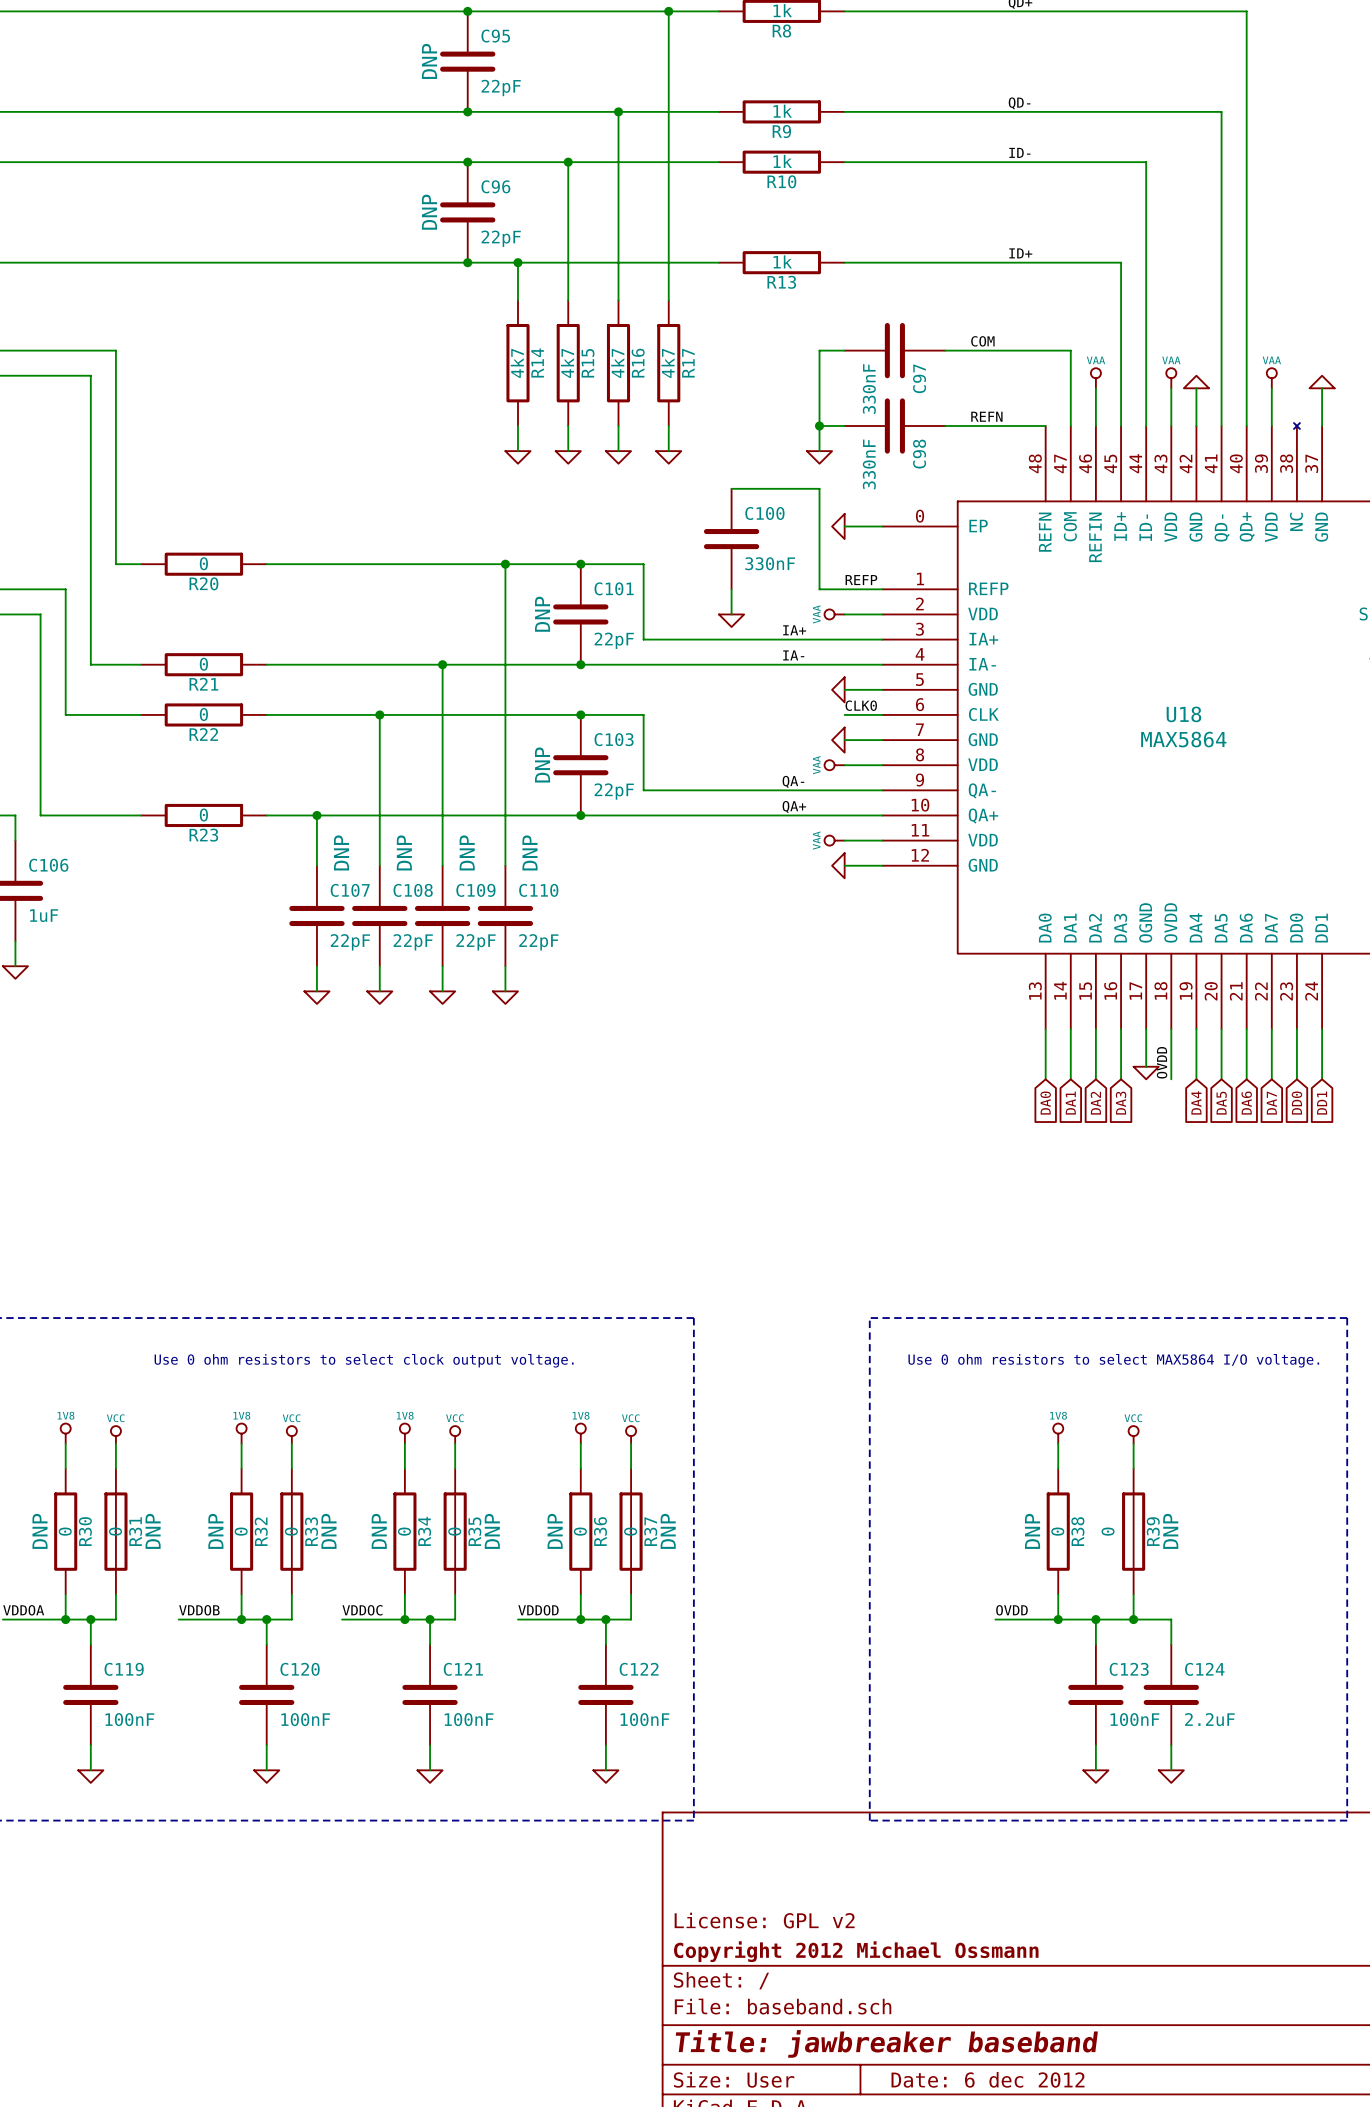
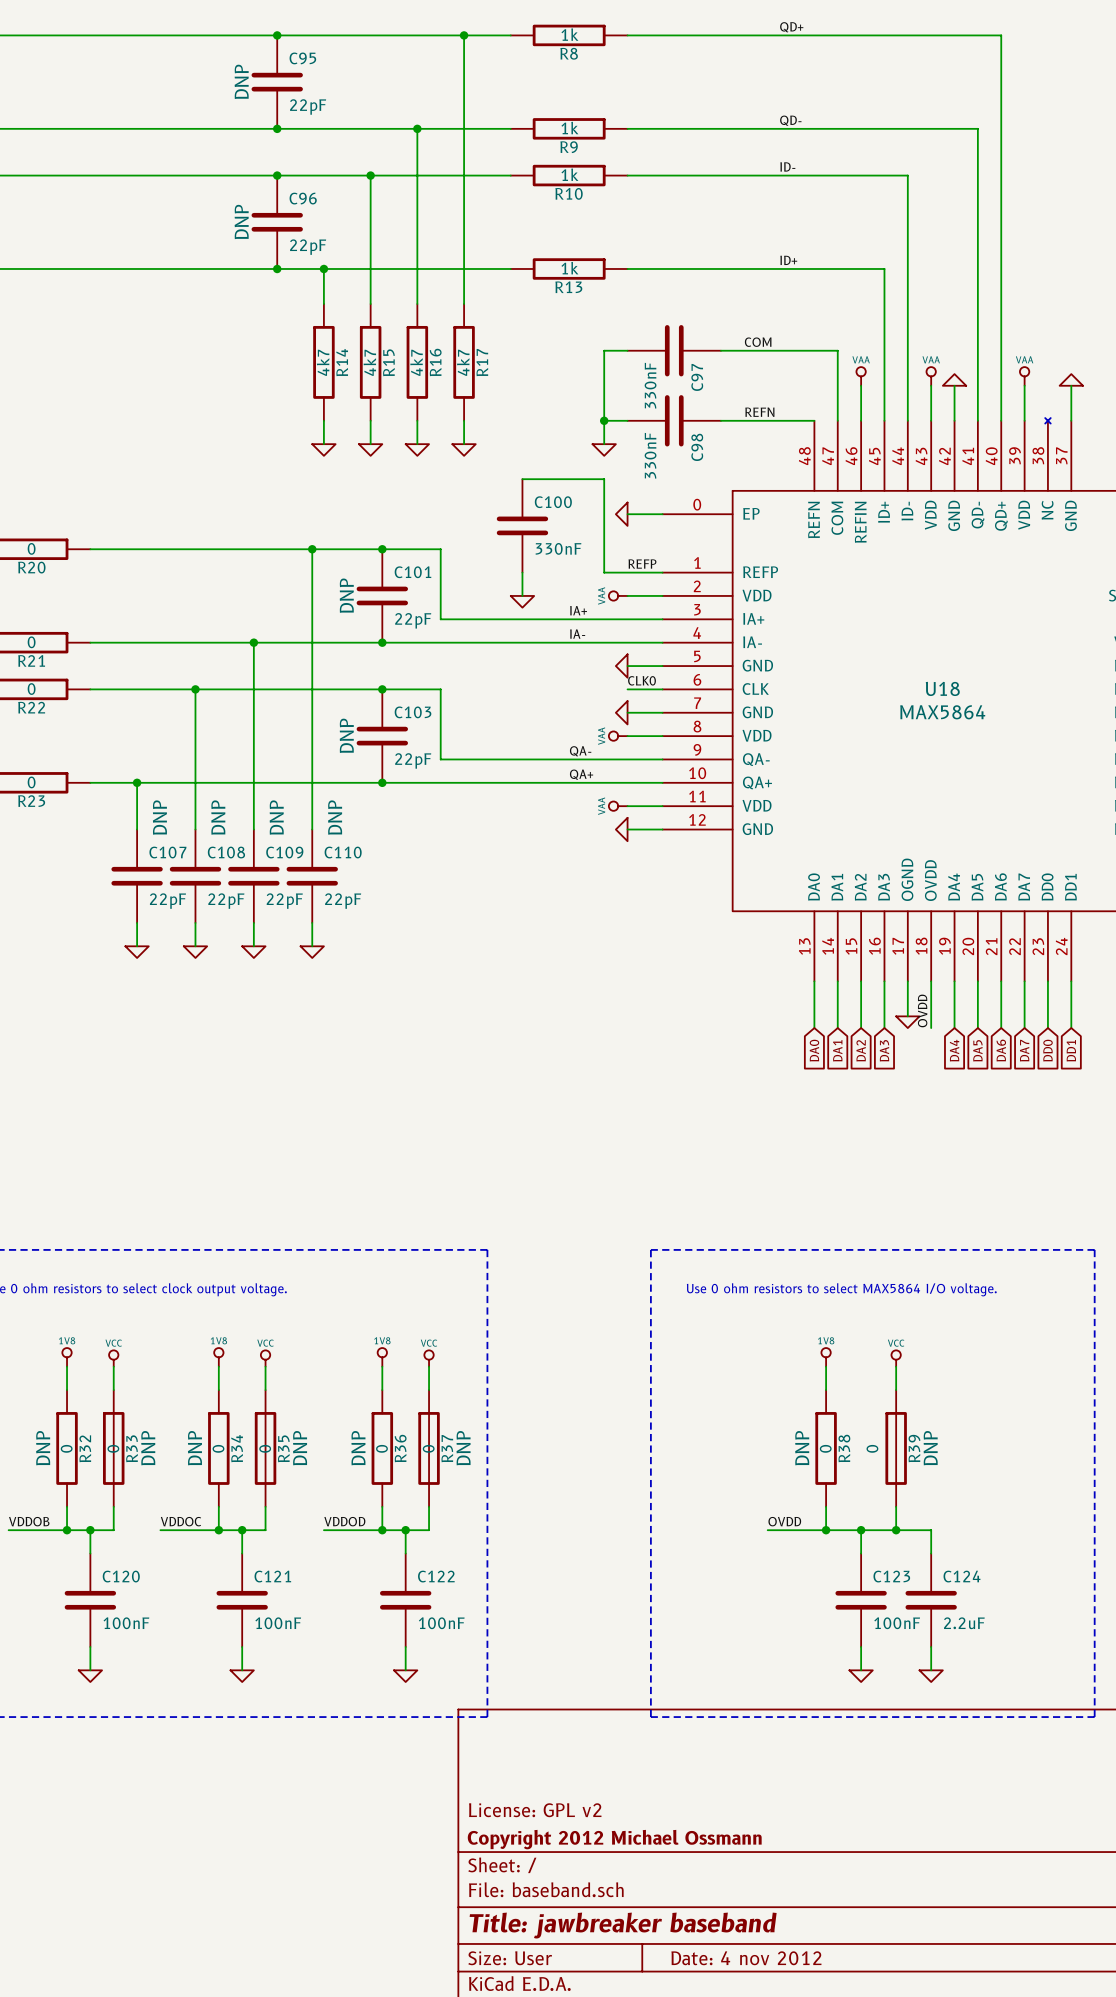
title block: Date: 6 dec 2012 (988, 2079) -> Date: 4 nov 2012 (746, 1958)

